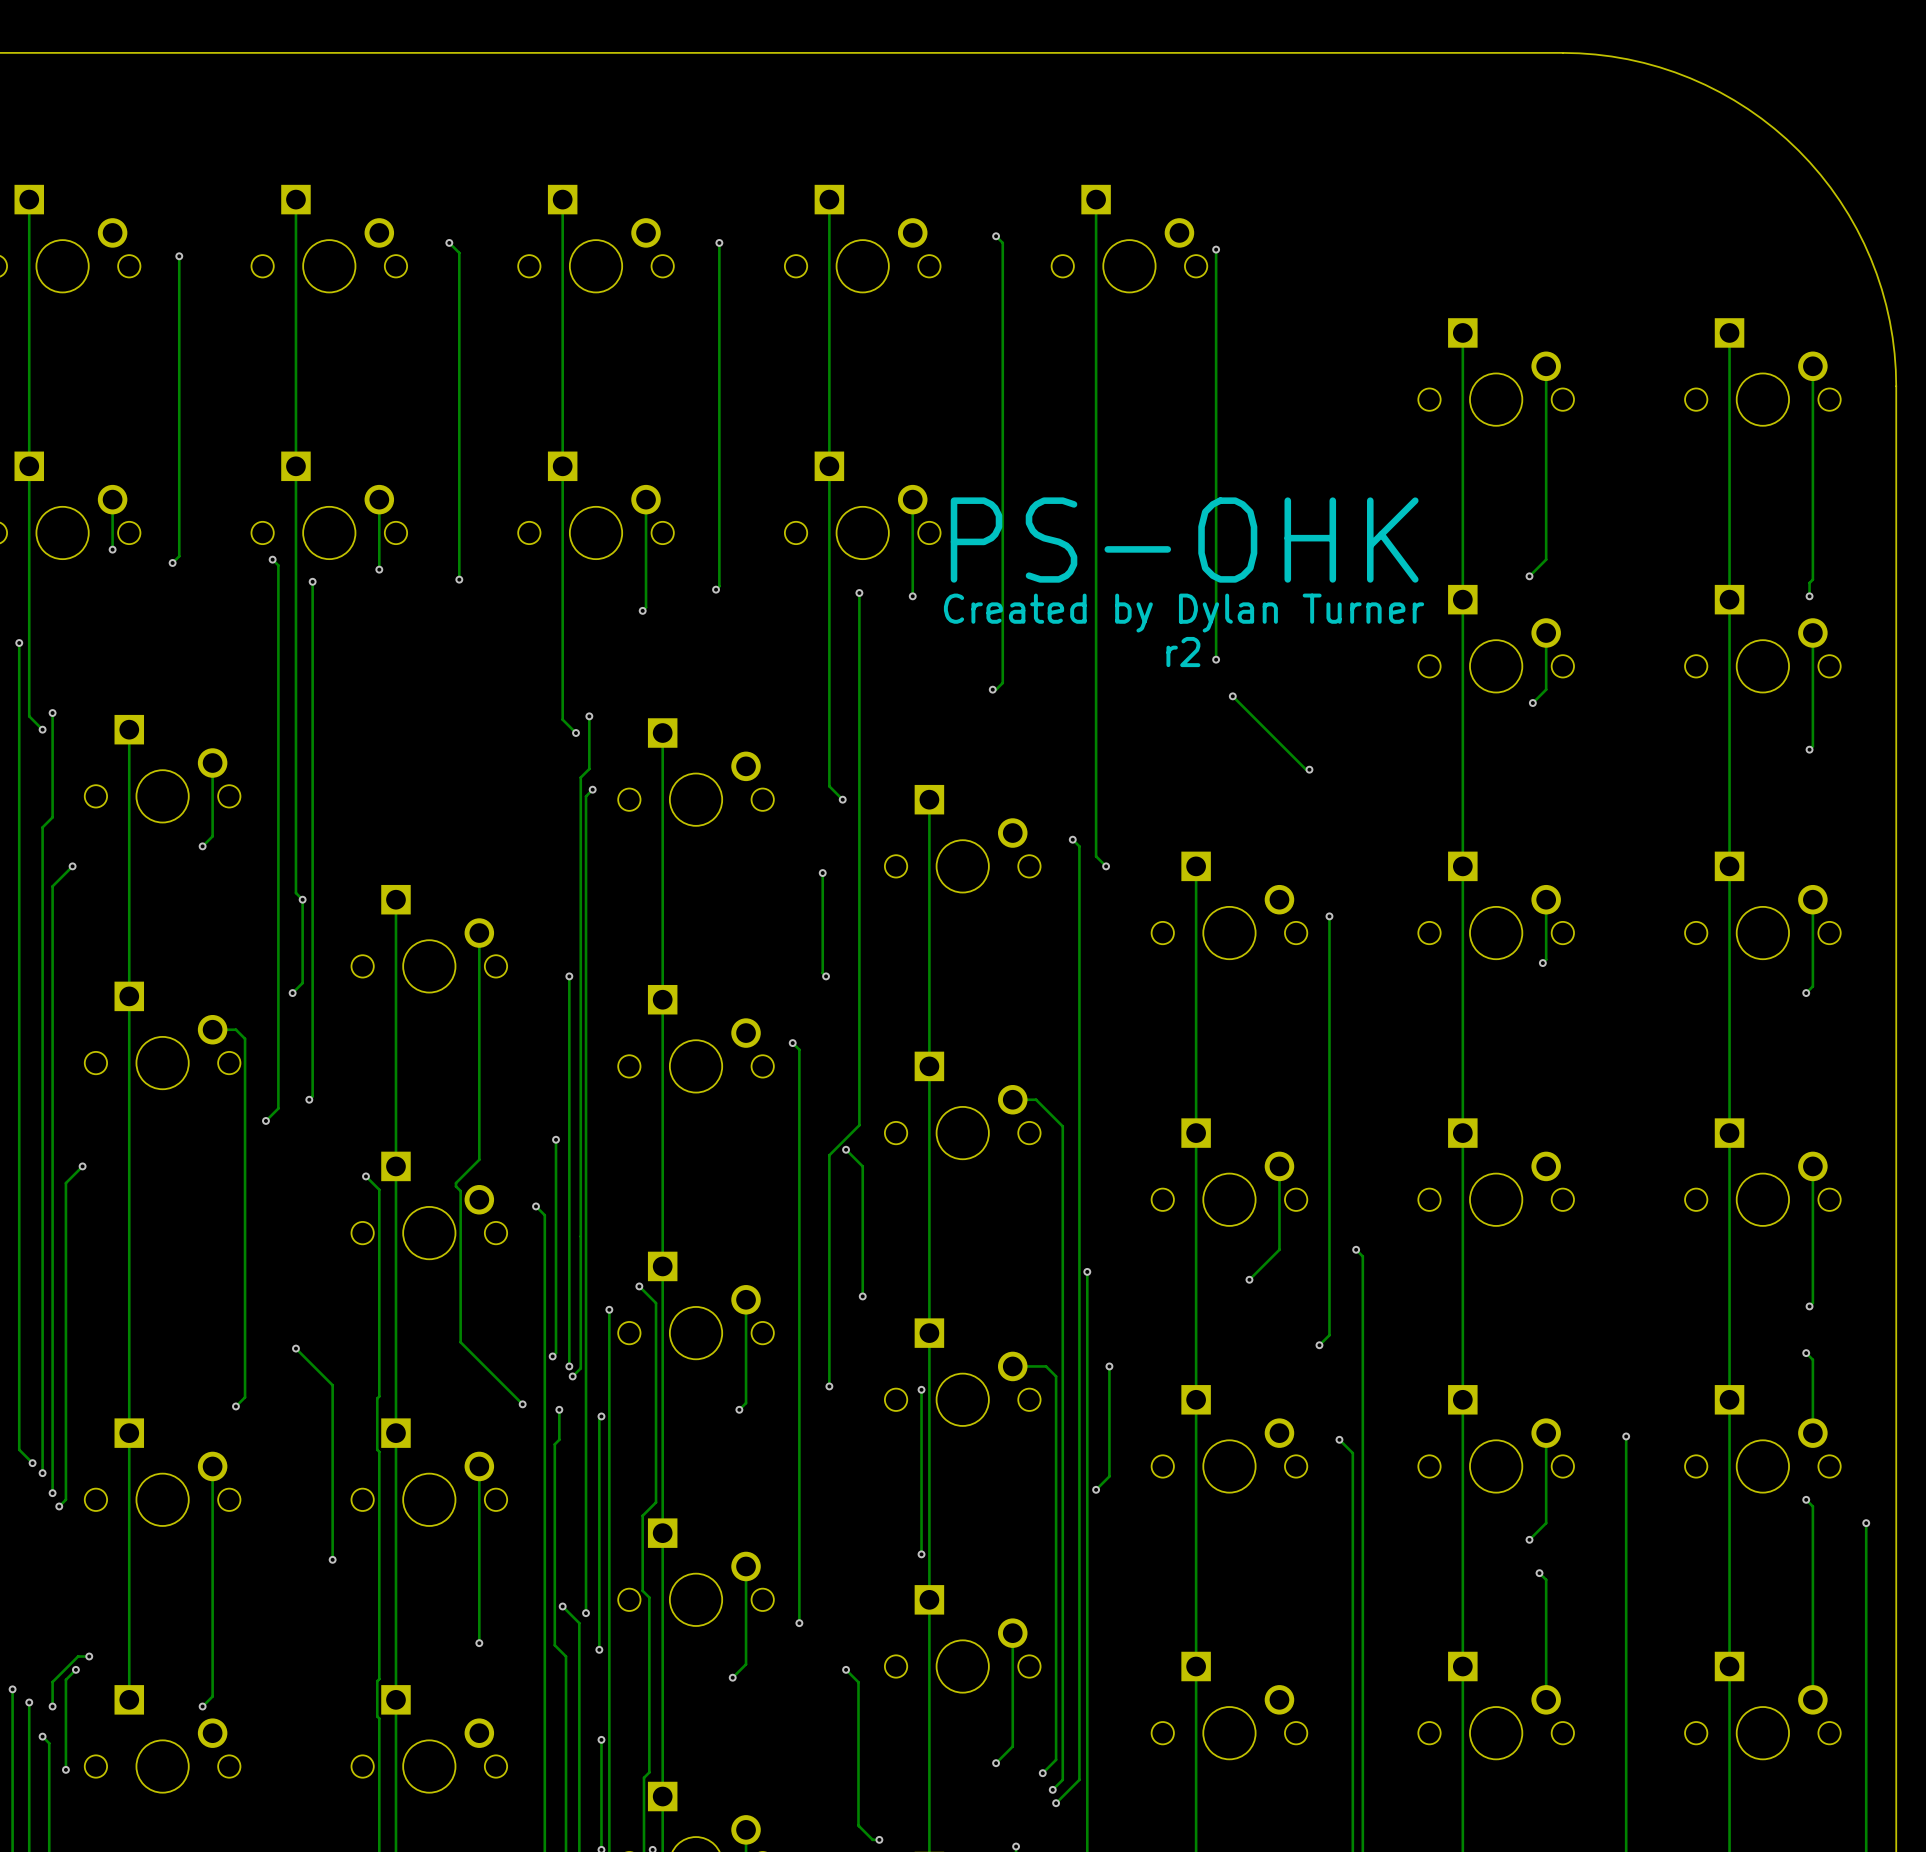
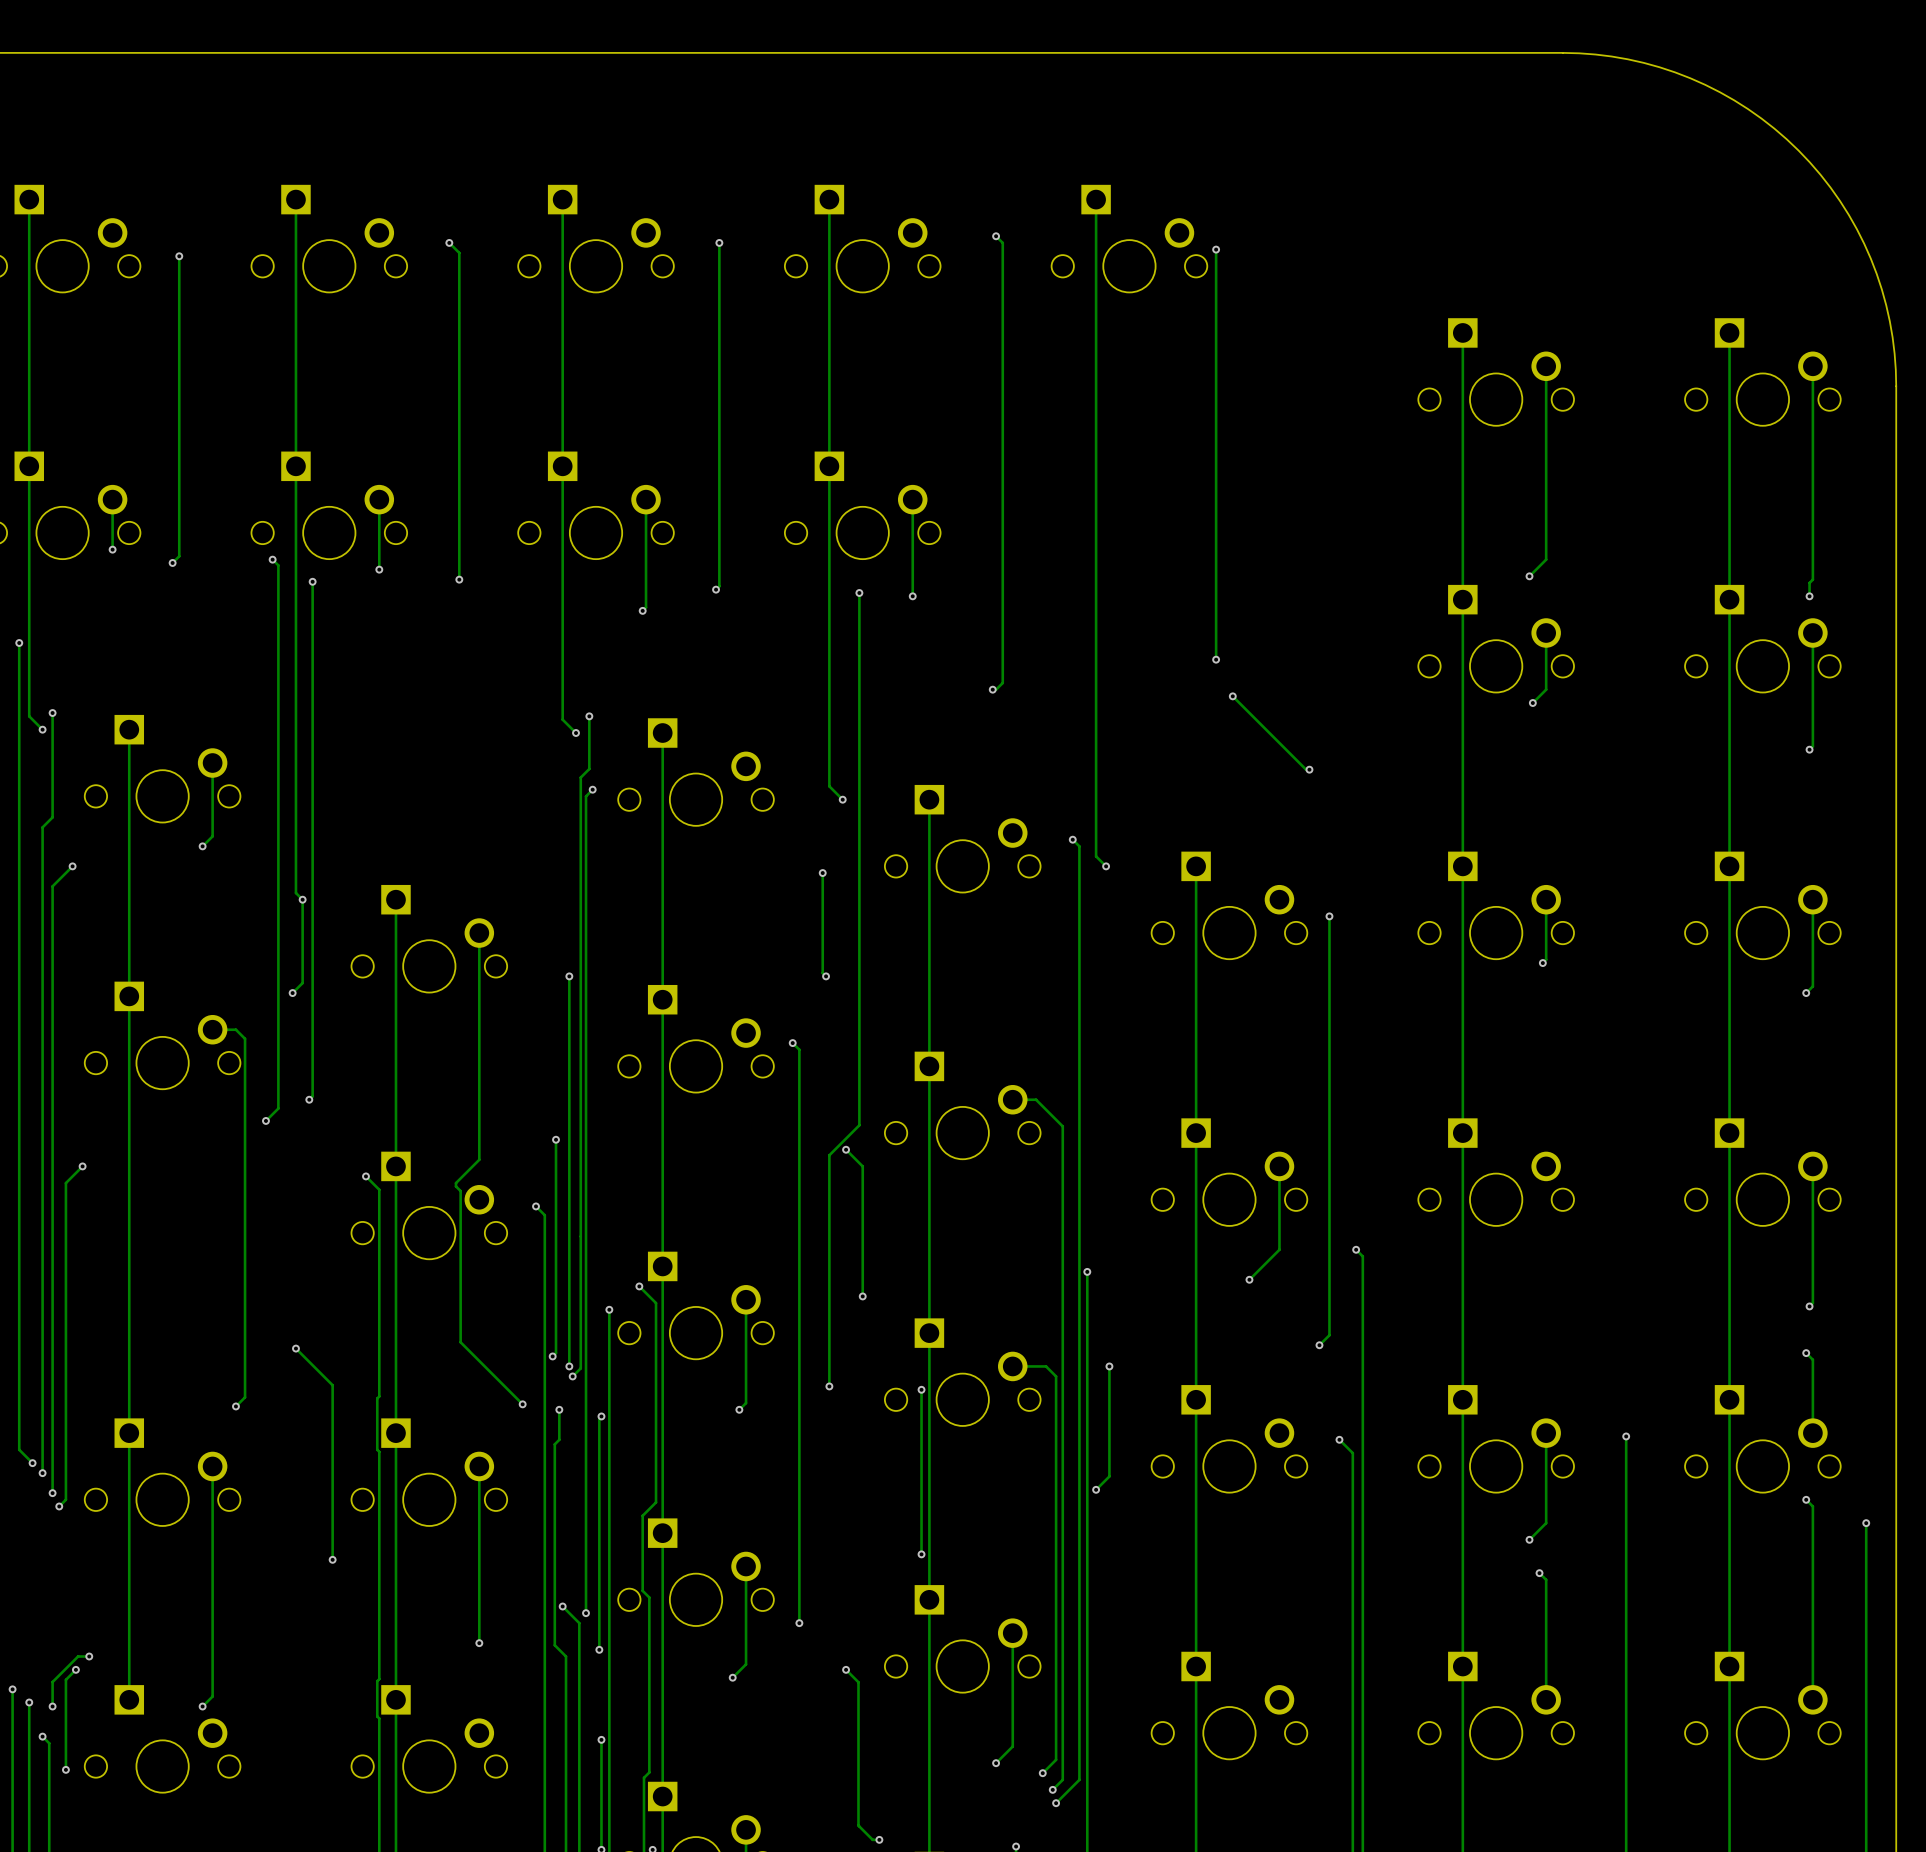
text: PS-OHK (1184, 540) -> none
text: Created by Dylan Turner (1184, 613) -> none
text: r2 (1183, 652) -> none

